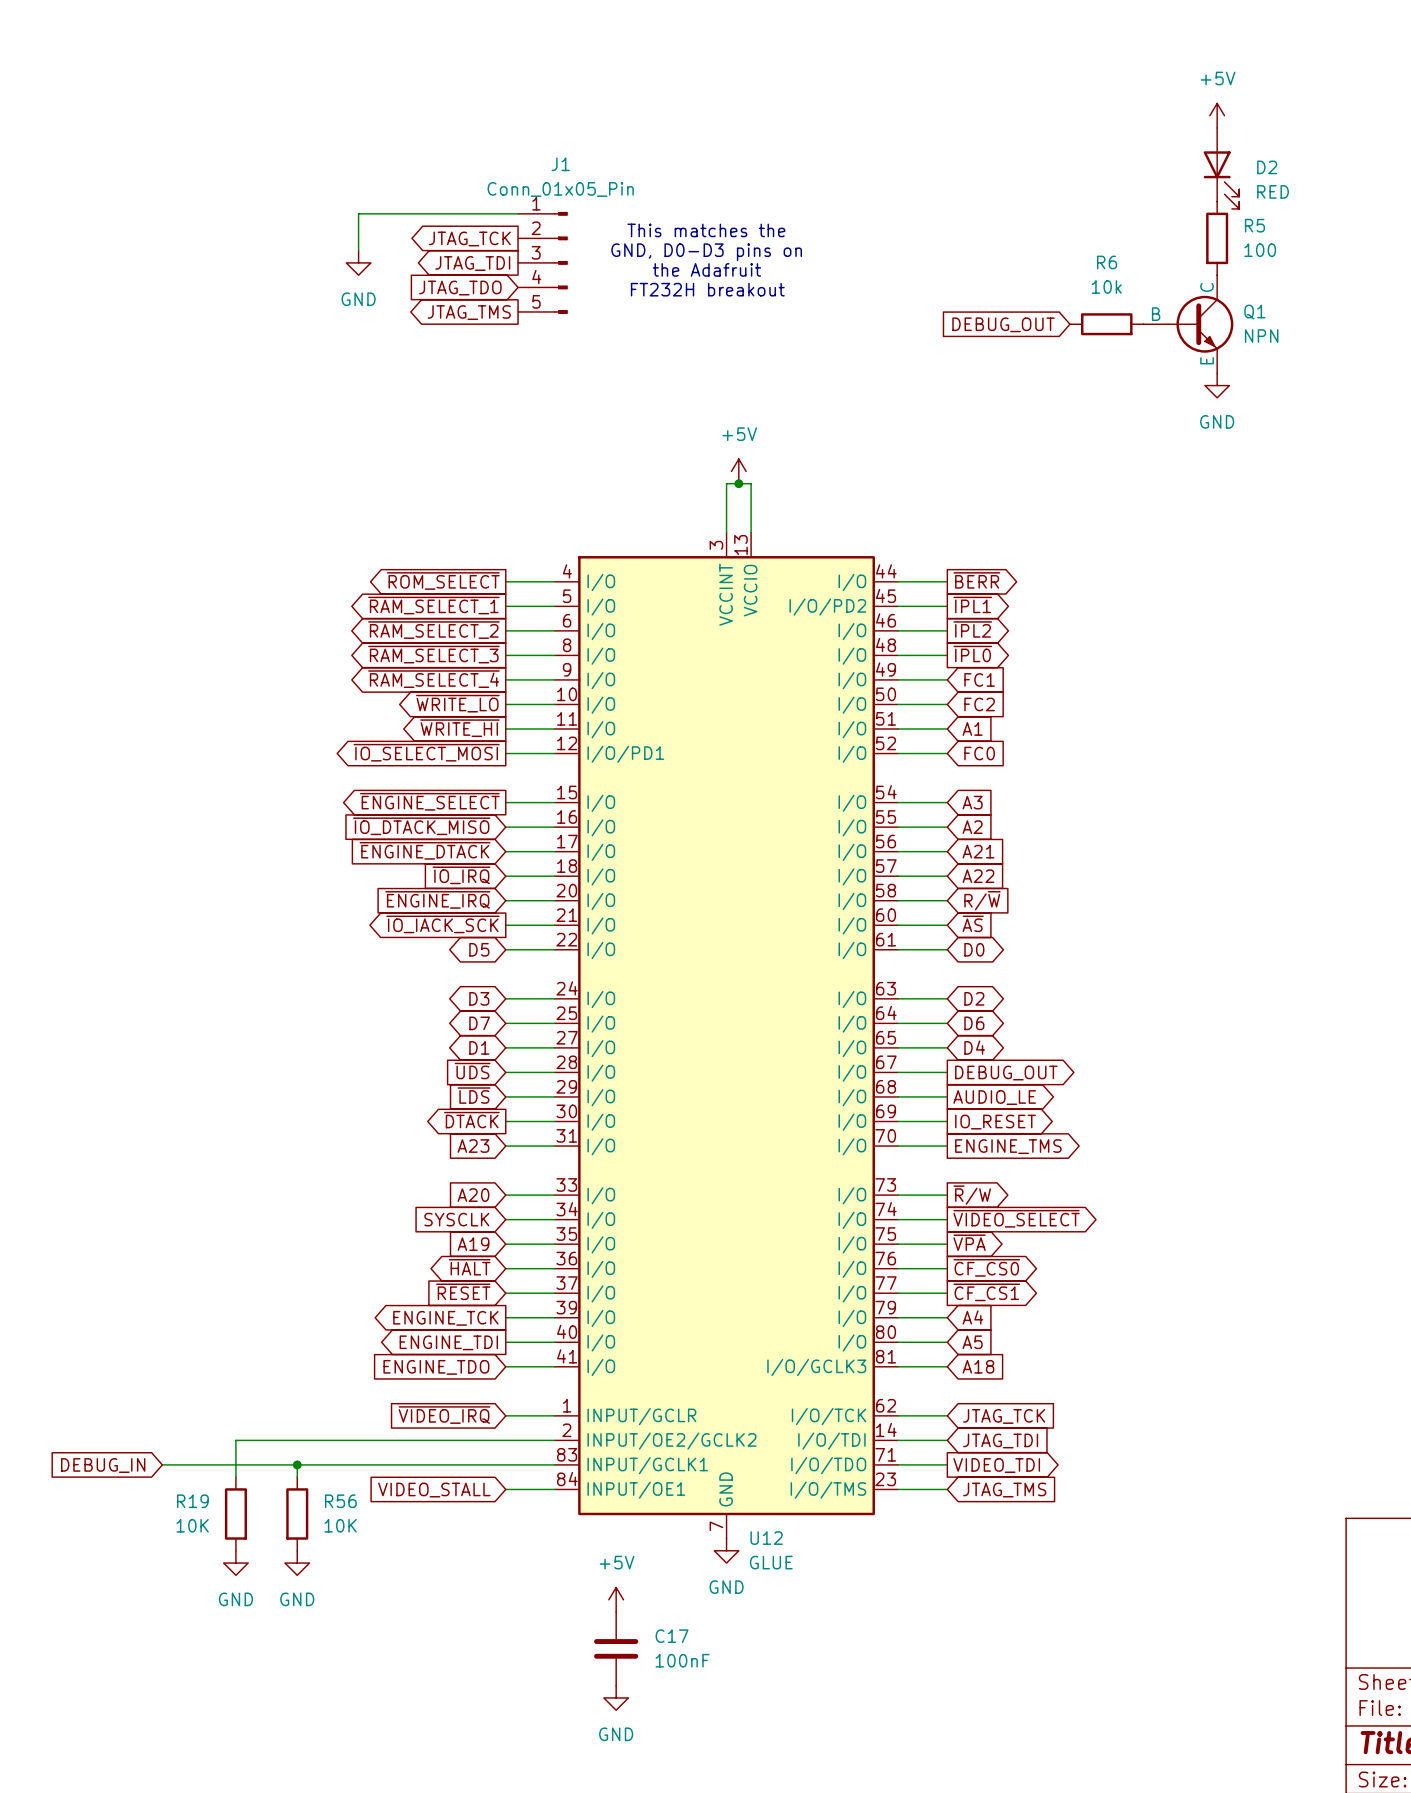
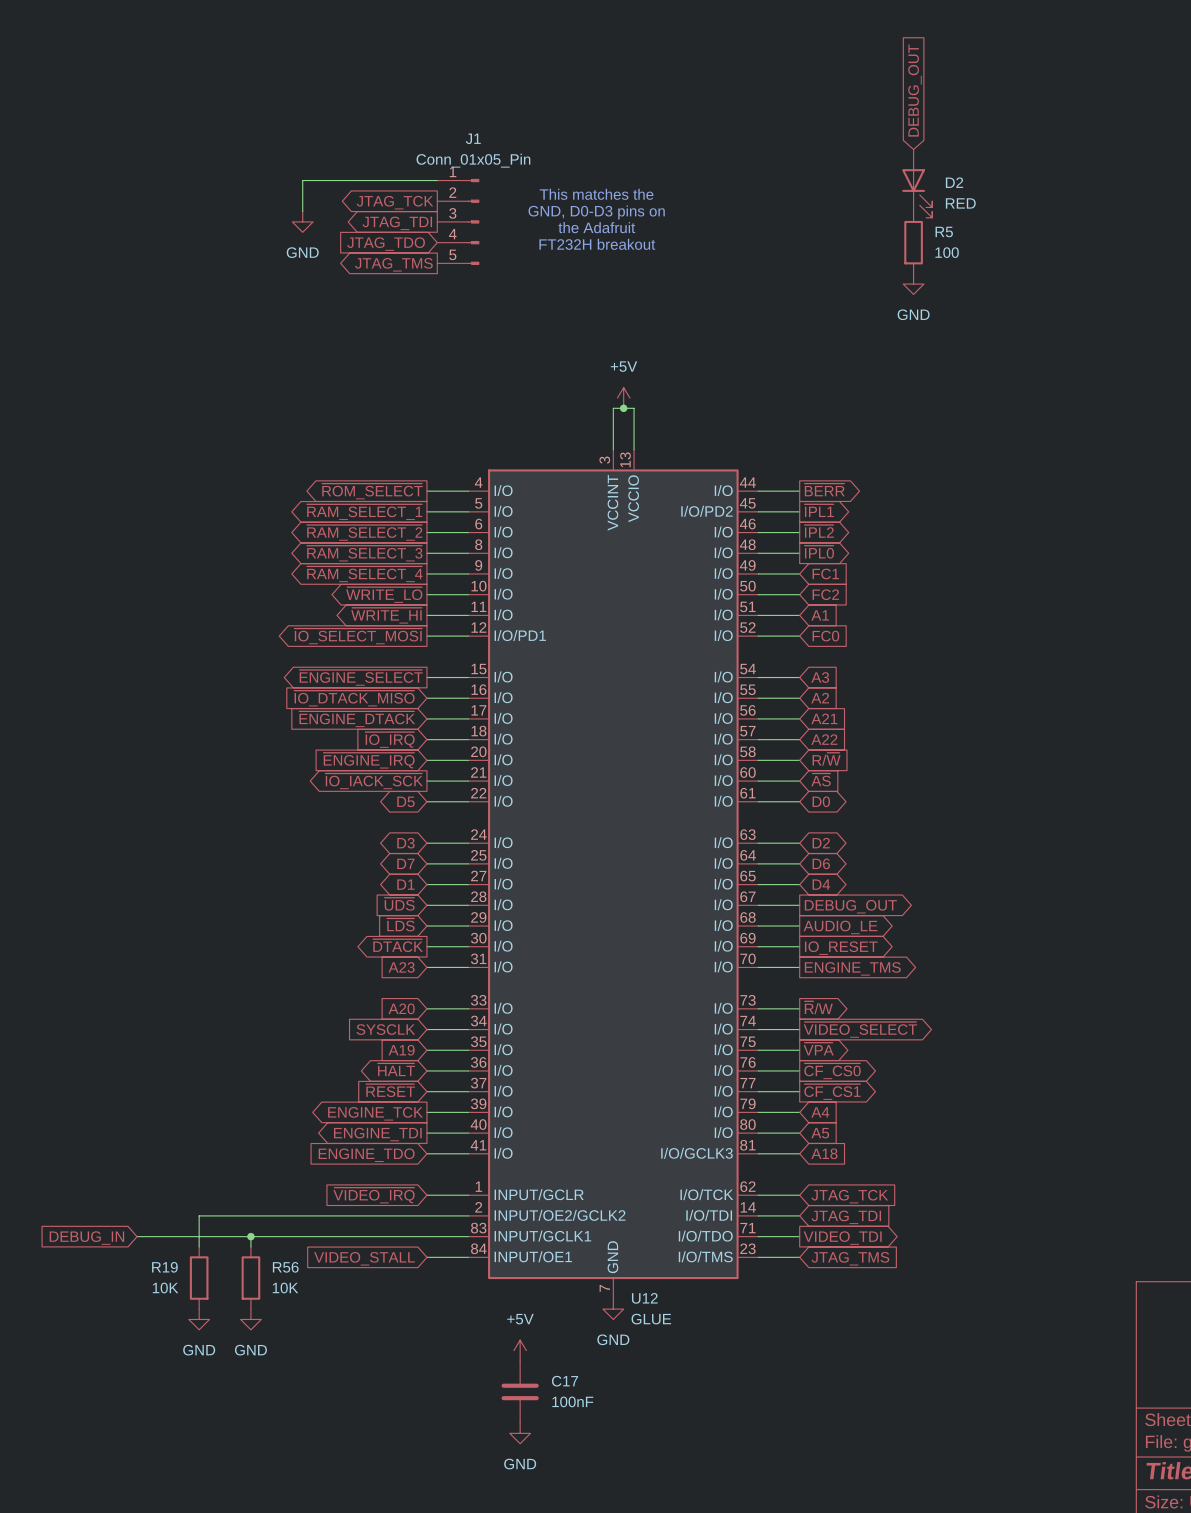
power symbol: +5V (1217, 115) -> none
D2 position: (1221, 168) -> (917, 183)
R5 position: (1217, 238) -> (913, 242)
global label rotation: 0° (1003, 324) -> 90° clockwise (915, 90)
global label position: DEBUG_OUT (1003, 324) -> DEBUG_OUT (915, 90)
R6: 10k (1106, 324) -> none
Q1: NPN (1188, 324) -> none
power symbol position: GND (1217, 385) -> GND (913, 284)

